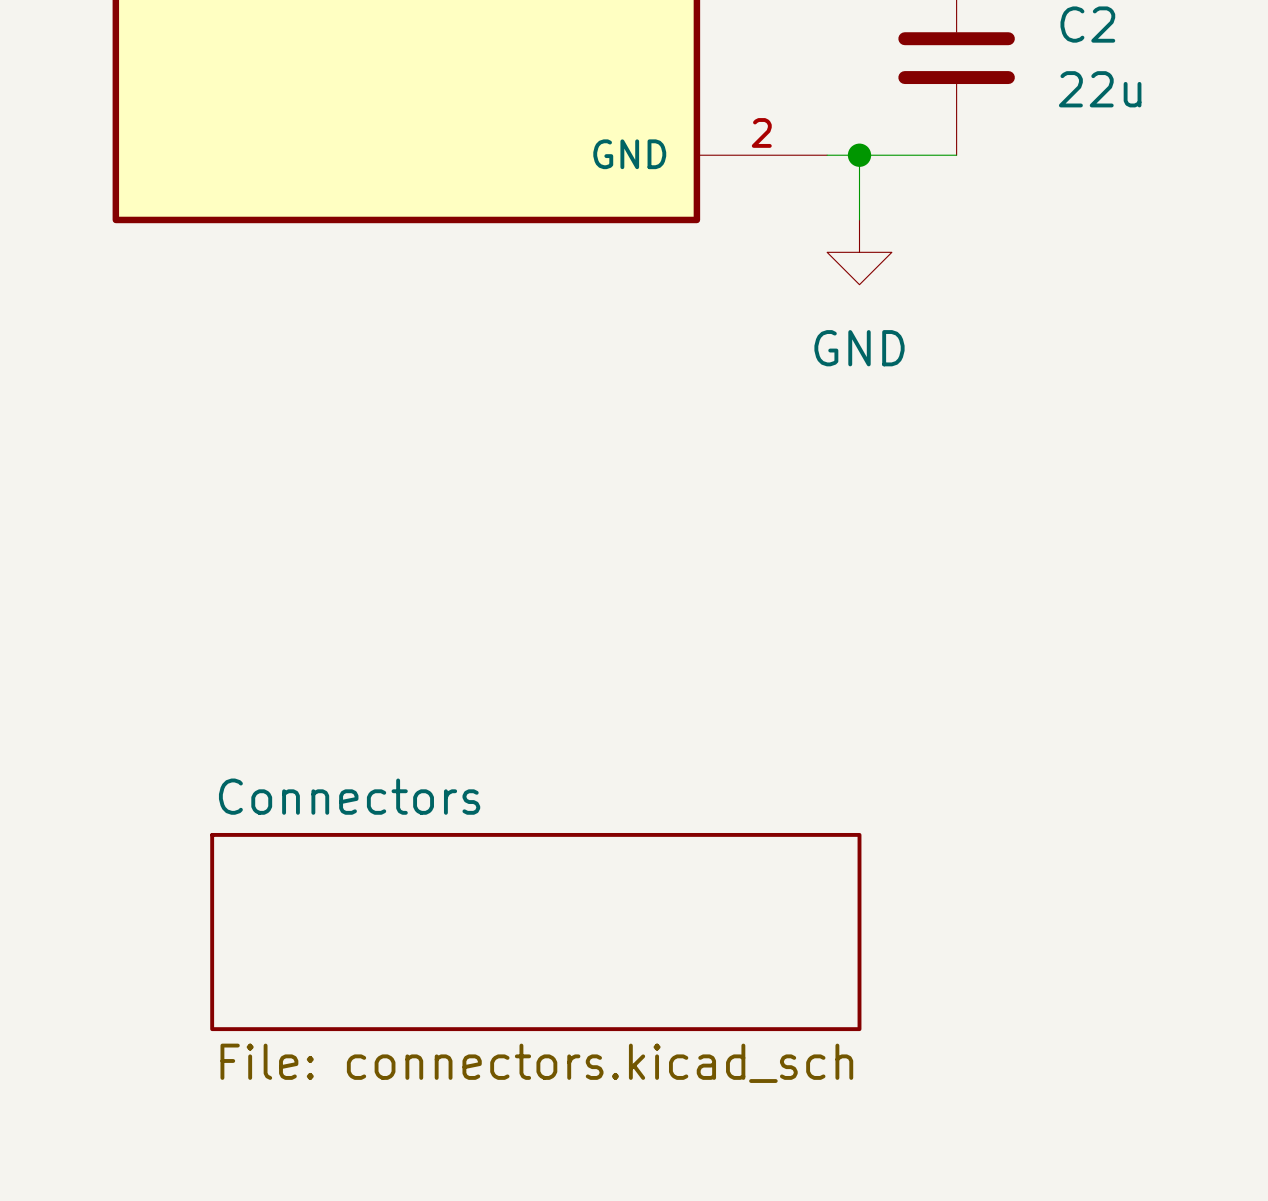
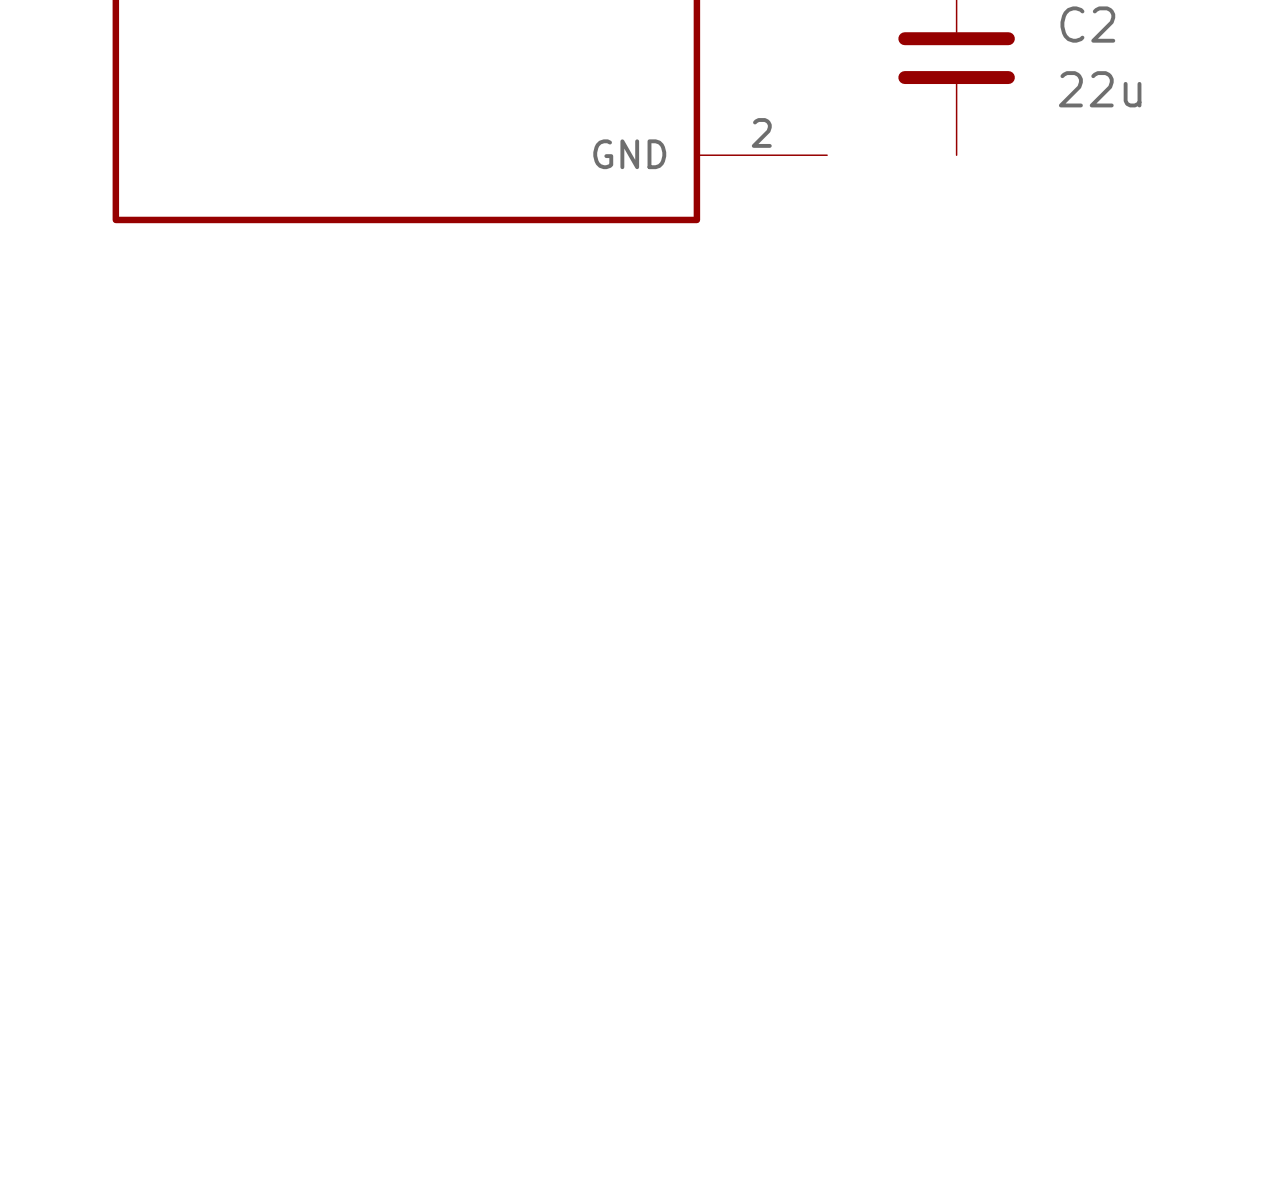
wire: (827, 155) (956, 155) -> none
wire: (859, 155) (859, 219) -> none
junction: (859, 155) -> none
power symbol: GND (859, 252) -> none
sheet Connectors: File: connectors.kicad_sch (535, 932) -> none

